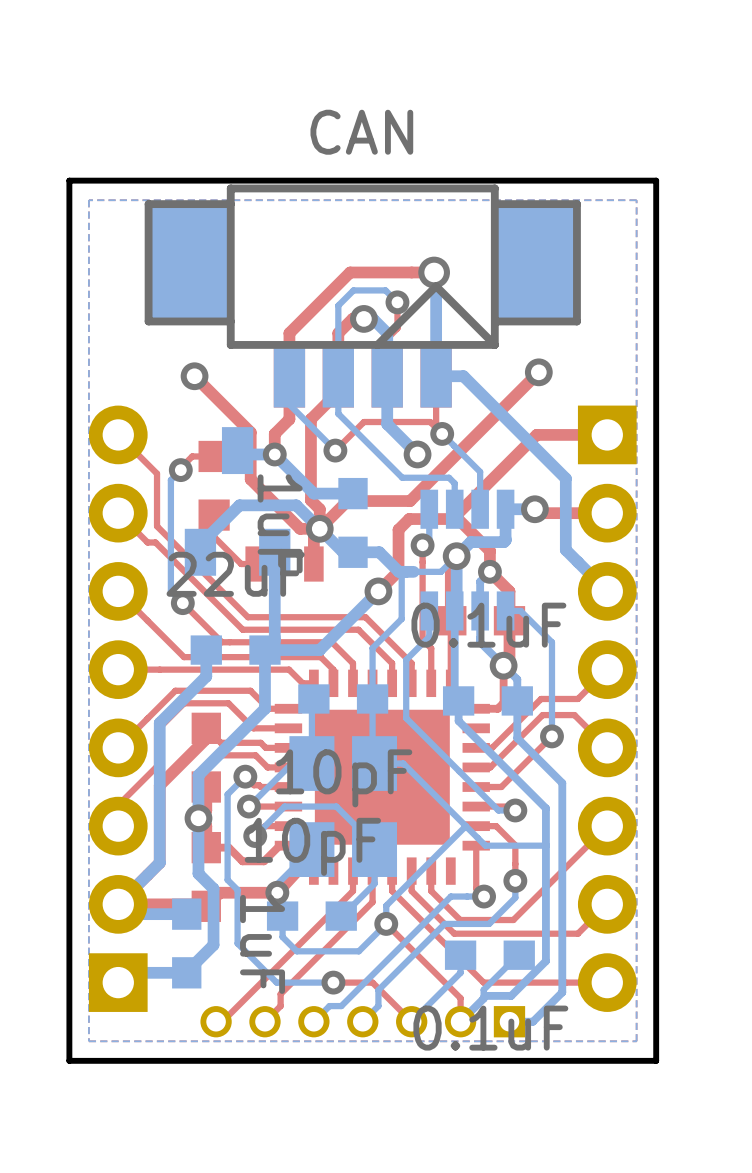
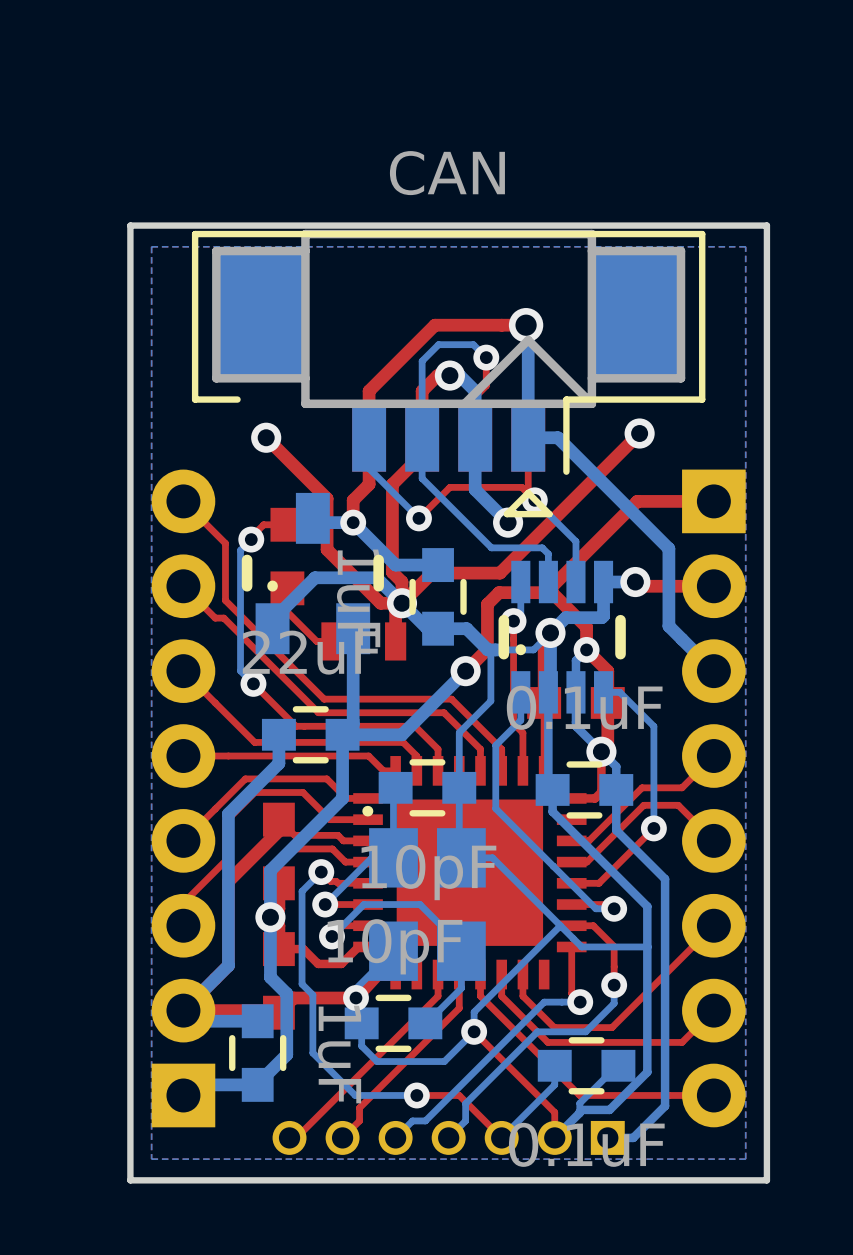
part footprint: [144, 184, 581, 408] -> [191, 229, 706, 518]
part footprint: [184, 427, 291, 576] -> [241, 492, 384, 655]
part footprint: [338, 477, 368, 568] -> [409, 548, 467, 646]
part footprint: [420, 489, 515, 631] -> [498, 560, 626, 714]
part footprint: [190, 635, 281, 665] -> [261, 706, 360, 764]
part footprint: [298, 684, 389, 714] -> [378, 759, 477, 817]
part footprint: [442, 686, 533, 716] -> [535, 761, 634, 819]
part footprint: [289, 736, 398, 877] -> [362, 805, 486, 981]
part footprint: [172, 898, 202, 989] -> [229, 1004, 287, 1102]
part footprint: [266, 901, 357, 931] -> [344, 994, 443, 1052]
part footprint: [444, 940, 535, 970] -> [537, 1037, 636, 1095]

